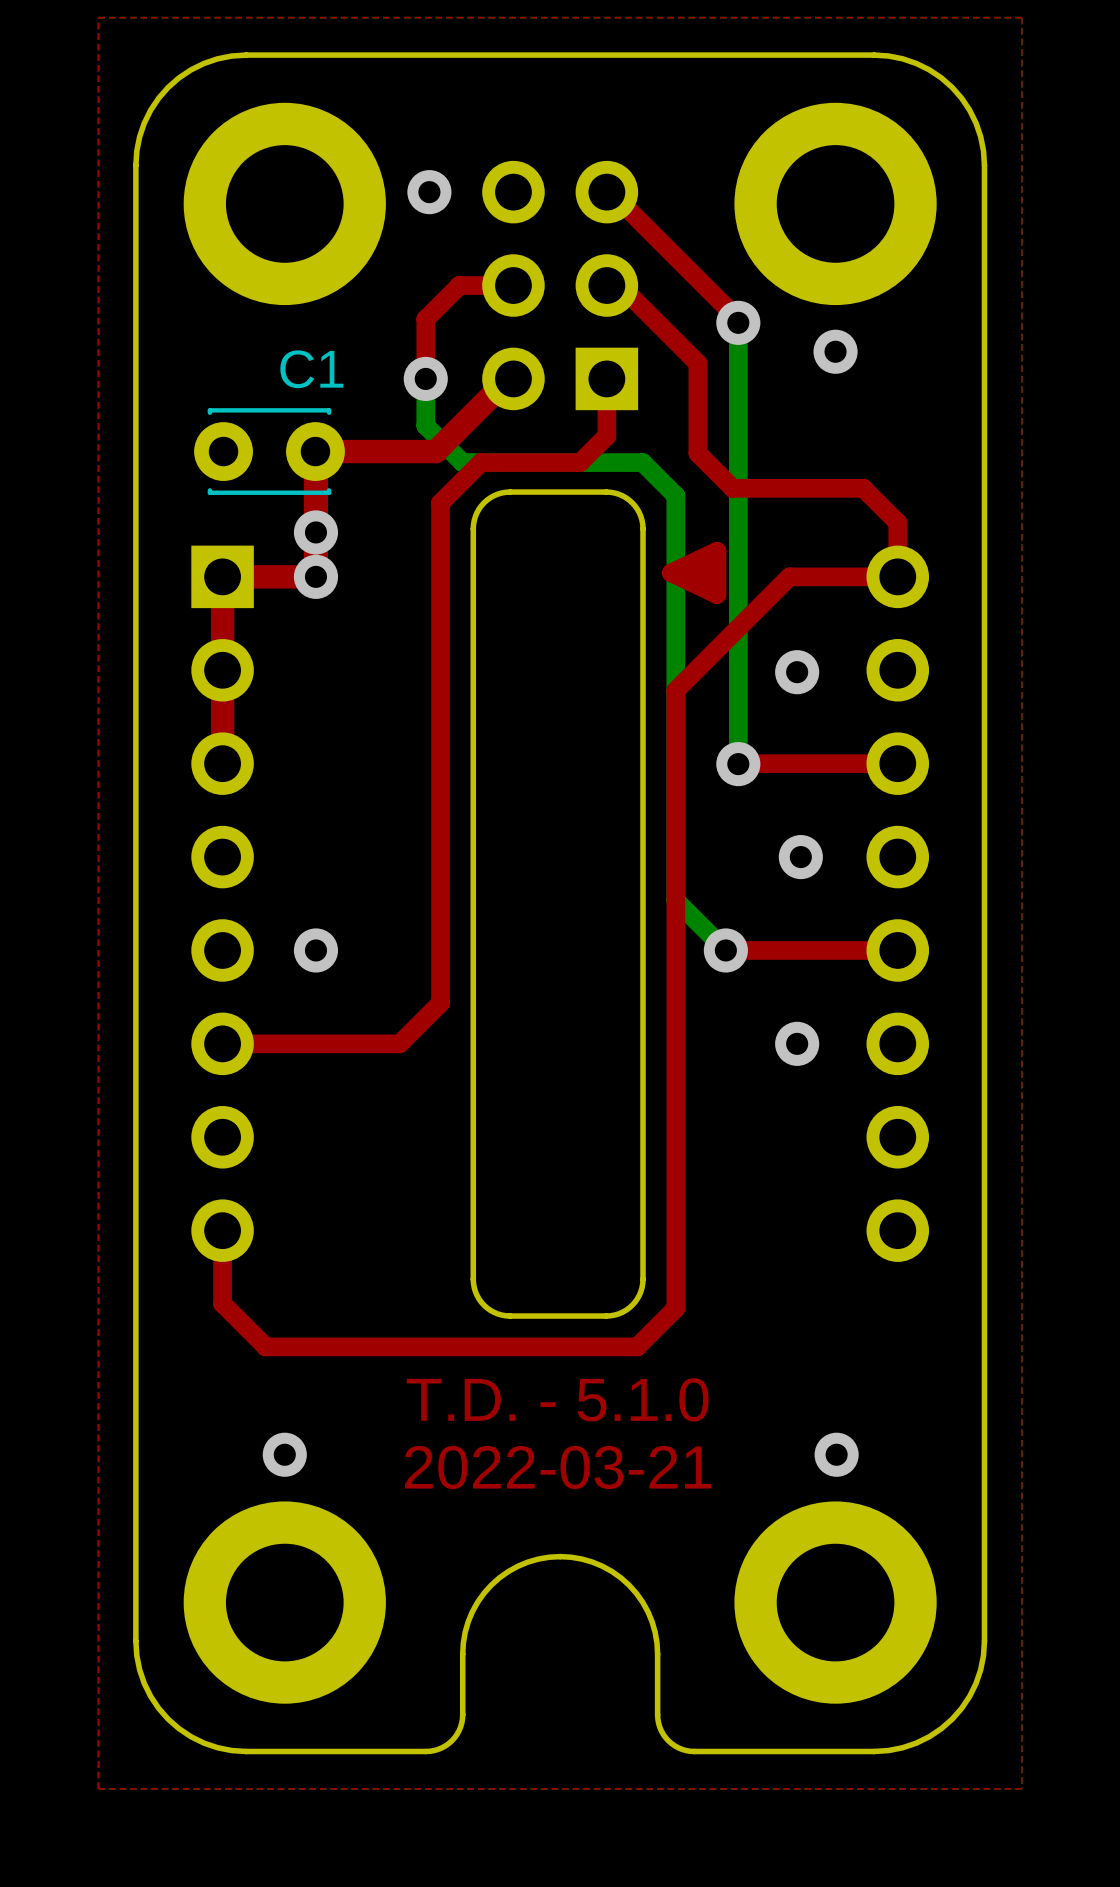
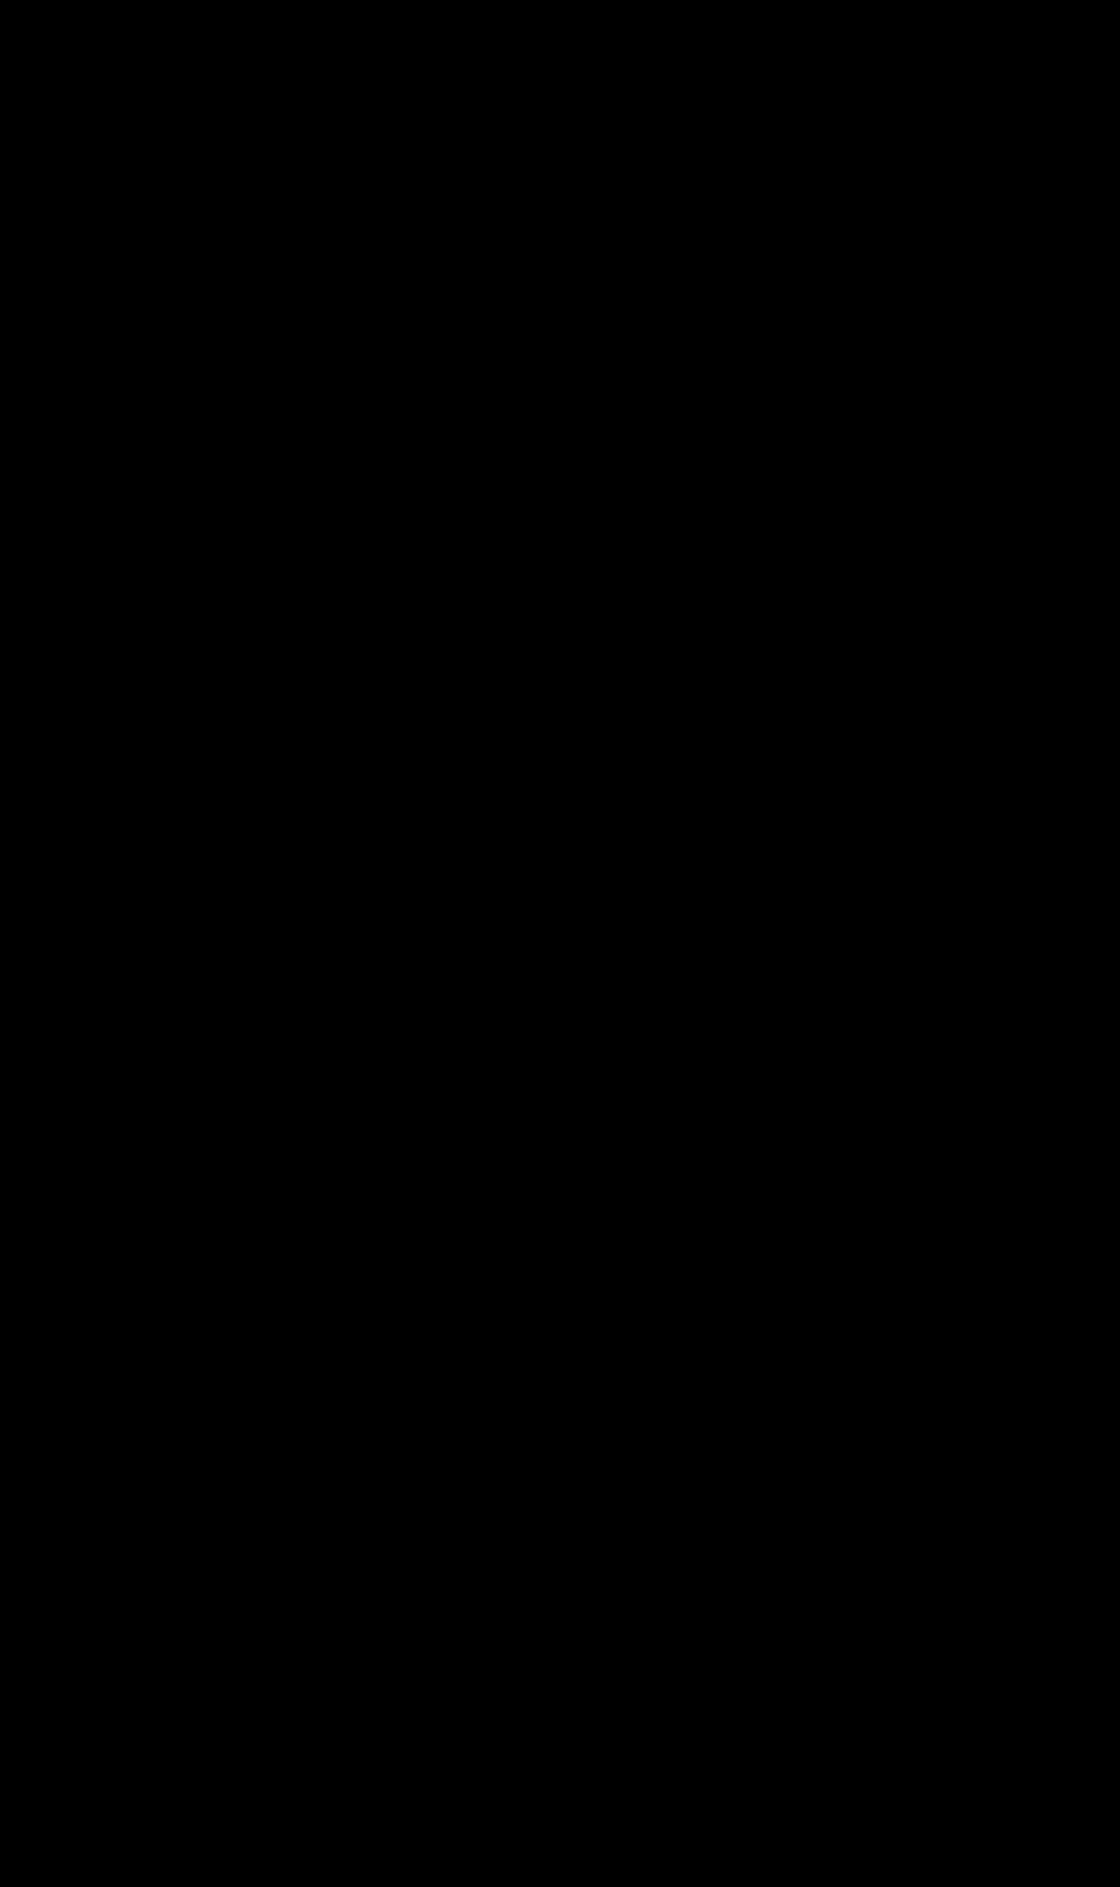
top zone outline: (98, 17) (98, 1788) (1021, 1788) (1021, 17) (98, 17) -> none
board edge: (246, 55) (888, 56) (916, 63) (941, 77) (961, 98) (976, 123) (980, 136) (984, 165) (984, 1641) (980, 1669) (969, 1696) (961, 1708) (941, 1728) (916, 1743) (888, 1750) (874, 1751) (694, 1751) (678, 1747) (665, 1737) (658, 1722) (657, 1643) (652, 1621) (642, 1602) (629, 1585) (612, 1571) (592, 1562) (571, 1557) (538, 1559) (517, 1566) (499, 1577) (477, 1602) (468, 1621) (463, 1643) (461, 1722) (454, 1737) (438, 1749) (425, 1751) (246, 1751) (217, 1747) (191, 1736) (168, 1719) (150, 1696) (144, 1683) (136, 1655) (135, 1641) (135, 165) (139, 136) (144, 123) (158, 98) (168, 87) (179, 77) (203, 63) (231, 56) (246, 55) -> none
via: (429, 192) -> none
top track: (606, 192) (610, 192) (738, 319) (738, 322) -> none
part: (284, 203) -> none
part: (835, 203) -> none
top track: (513, 285) (459, 285) (425, 319) (425, 378) -> none
part: (560, 285) -> none
top track: (606, 285) (620, 285) (697, 363) (697, 453) (732, 488) (863, 488) (897, 522) (897, 576) (789, 576) (675, 690) (675, 1308) (637, 1346) (265, 1346) (222, 1303) (222, 1230) -> none
bottom track: (738, 322) (738, 764) -> none
via: (738, 322) -> none
via: (835, 351) -> none
bottom track: (425, 378) (425, 425) (462, 462) (642, 462) (675, 495) (675, 900) (725, 950) -> none
via: (425, 378) -> none
top track: (513, 378) (508, 378) (435, 451) (311, 451) (315, 455) (315, 580) (311, 576) (222, 576) (222, 763) -> none
top track: (606, 378) (606, 435) (580, 462) (480, 462) (440, 503) (440, 1003) (399, 1043) (222, 1043) -> none
C1: (269, 451) -> none
board edge: (510, 492) (614, 492) (625, 497) (634, 505) (642, 524) (643, 1279) (640, 1291) (634, 1302) (622, 1312) (610, 1315) (501, 1315) (484, 1305) (476, 1295) (473, 1283) (473, 528) (475, 516) (484, 502) (497, 494) (510, 492) -> none
via: (315, 532) -> none
drawing: [662, 541, 727, 604] -> none
via: (315, 576) -> none
via: (797, 672) -> none
top track: (738, 763) (897, 763) -> none
via: (738, 764) -> none
via: (800, 857) -> none
part: (222, 903) -> none
part: (897, 903) -> none
via: (315, 950) -> none
top track: (725, 950) (897, 950) -> none
via: (725, 950) -> none
via: (797, 1043) -> none
text: T.D. - 5.1.0 (557, 1399) -> none
via: (284, 1454) -> none
via: (836, 1454) -> none
text: 2022-03-21 (558, 1467) -> none
part: (284, 1602) -> none
part: (835, 1602) -> none

